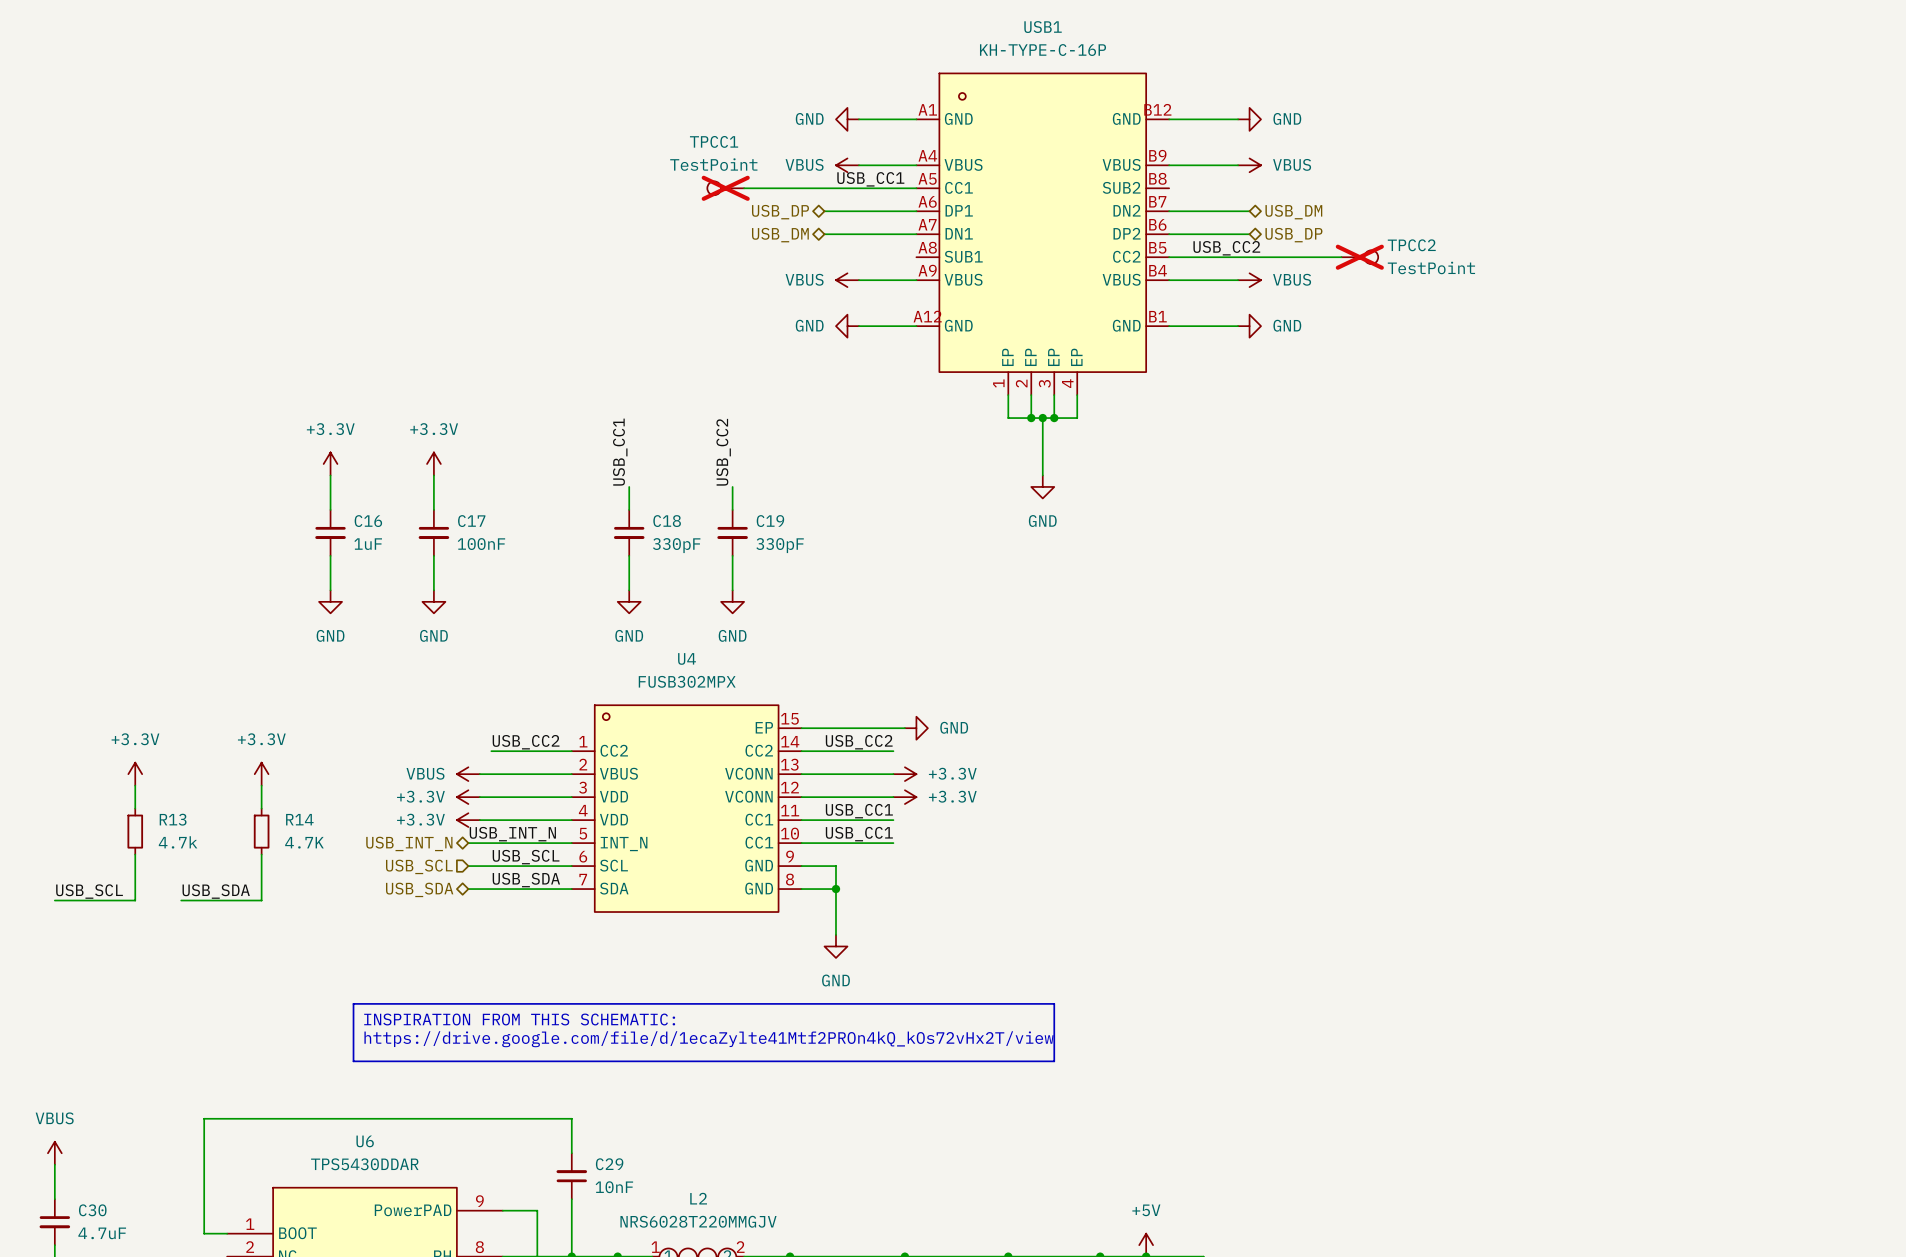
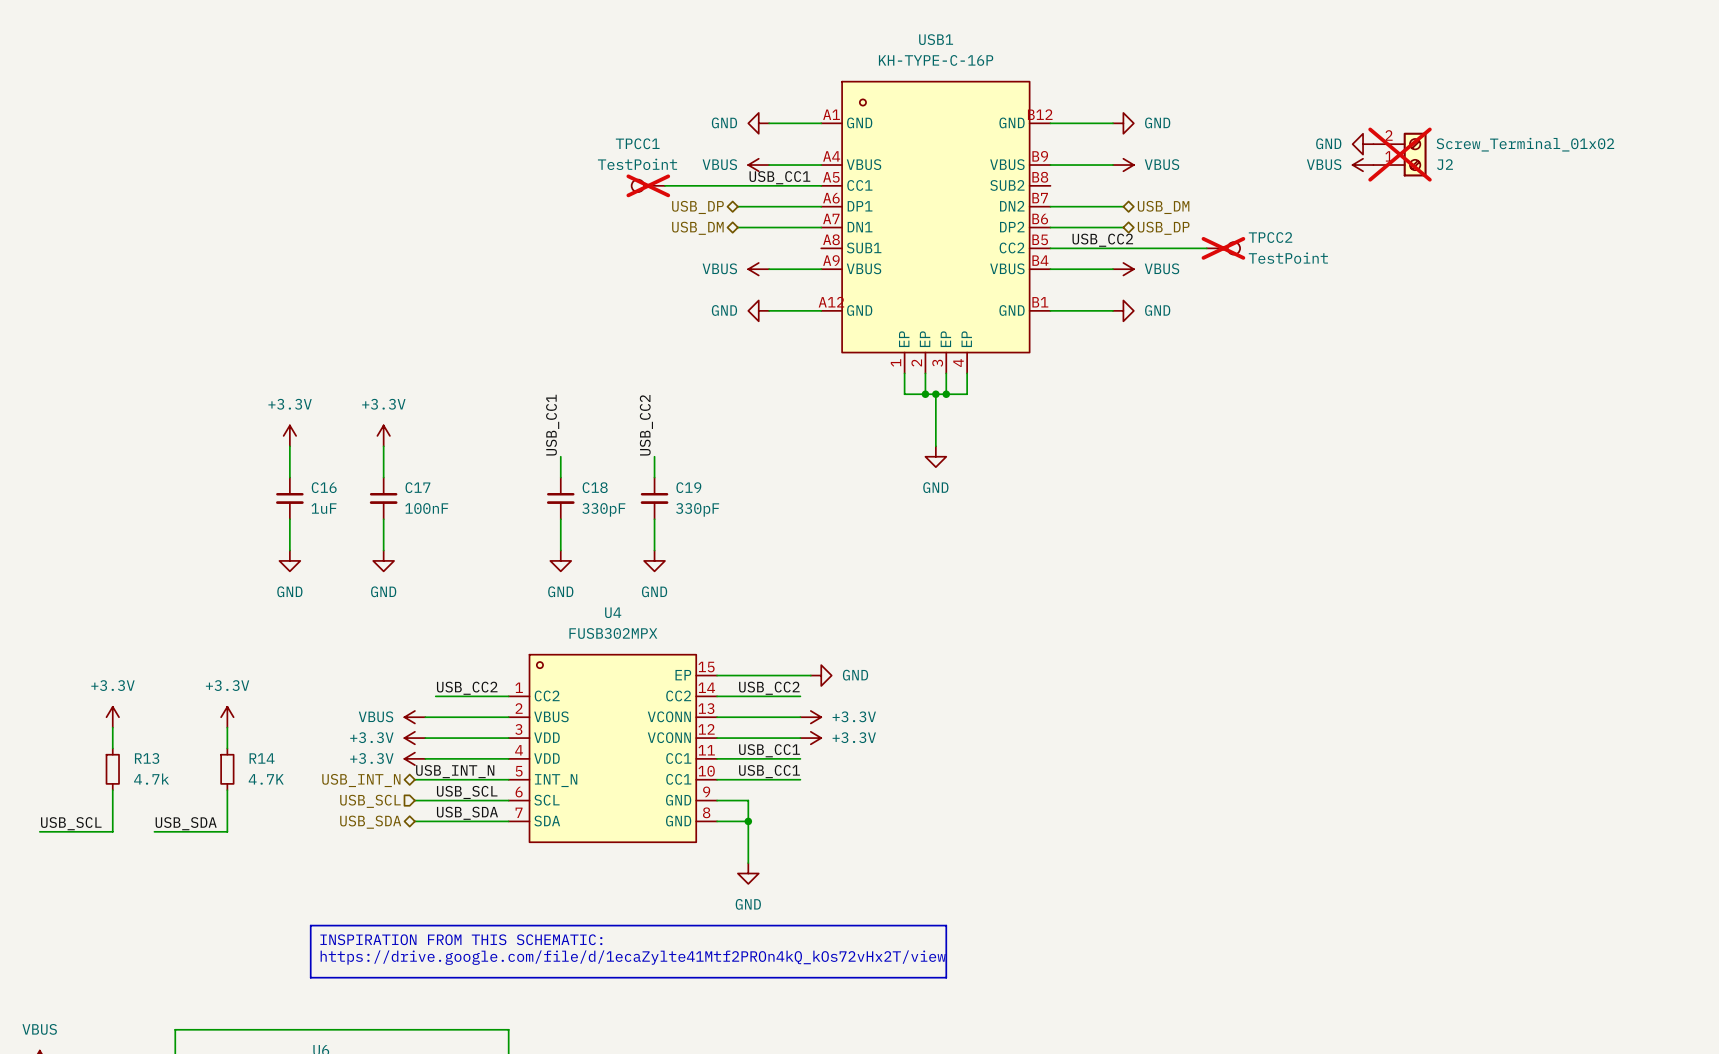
power symbol: none -> GND (1363, 144)
J2: none -> Screw_Terminal_01x02 (1400, 154)
power symbol: none -> VBUS (1363, 165)

